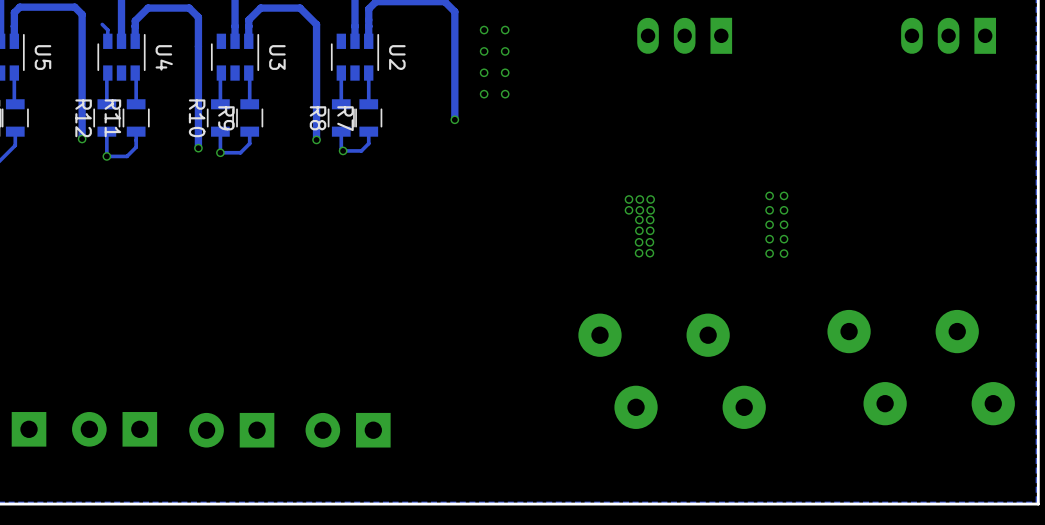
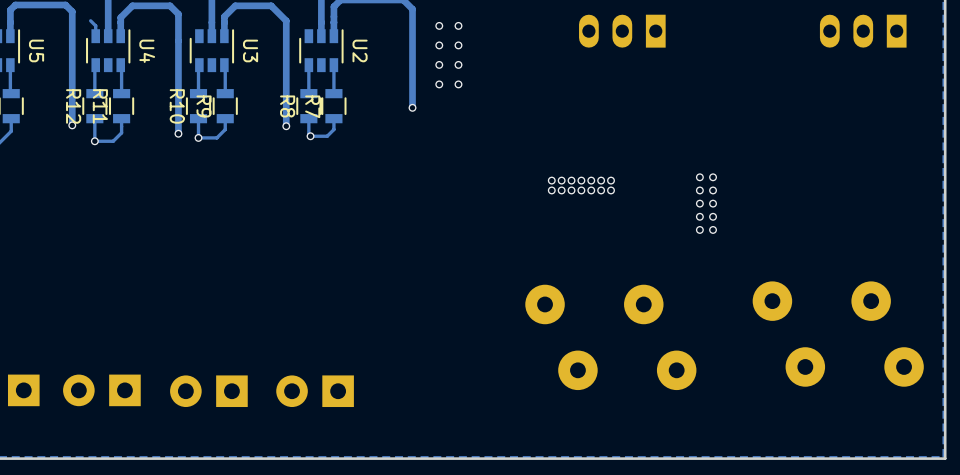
via: none -> (551, 180)
via: none -> (561, 180)
via: none -> (601, 180)
via: none -> (611, 180)
via: none -> (551, 190)
via: none -> (561, 190)
via: none -> (601, 190)
via: none -> (611, 190)
via: (639, 219) -> none
via: (650, 219) -> none
via: (639, 230) -> none
via: (650, 230) -> none
via: (639, 242) -> none
via: (649, 242) -> none
via: (639, 253) -> none
via: (649, 253) -> none

